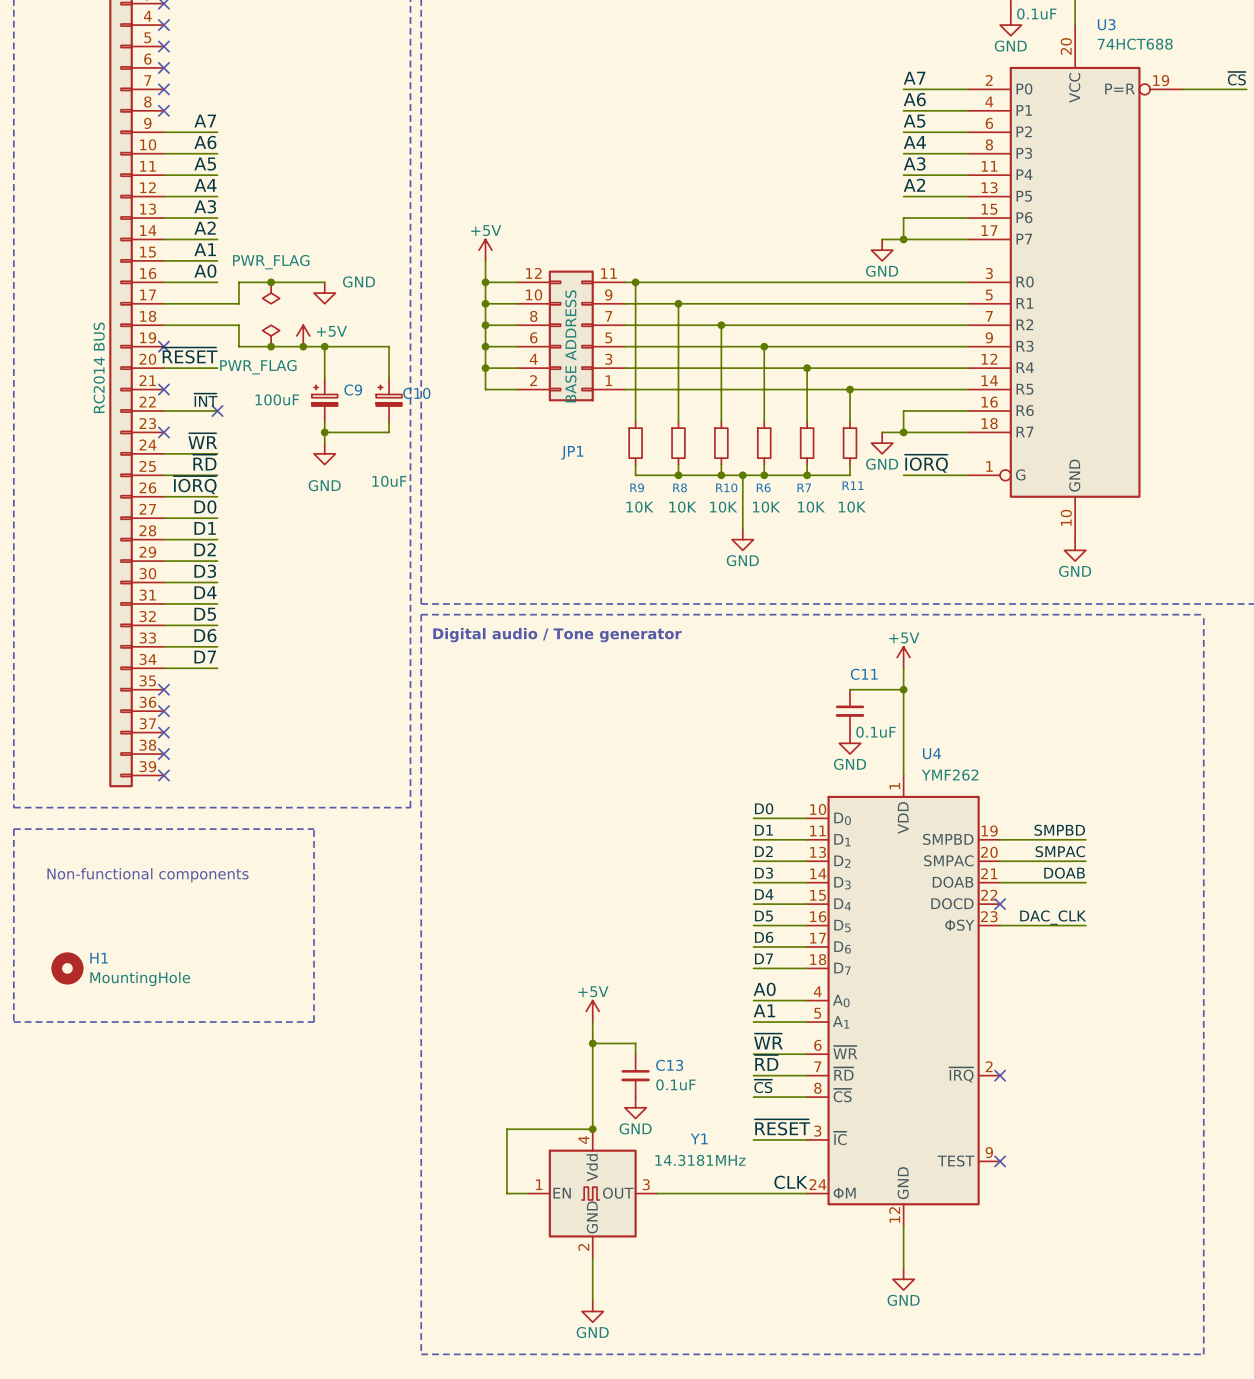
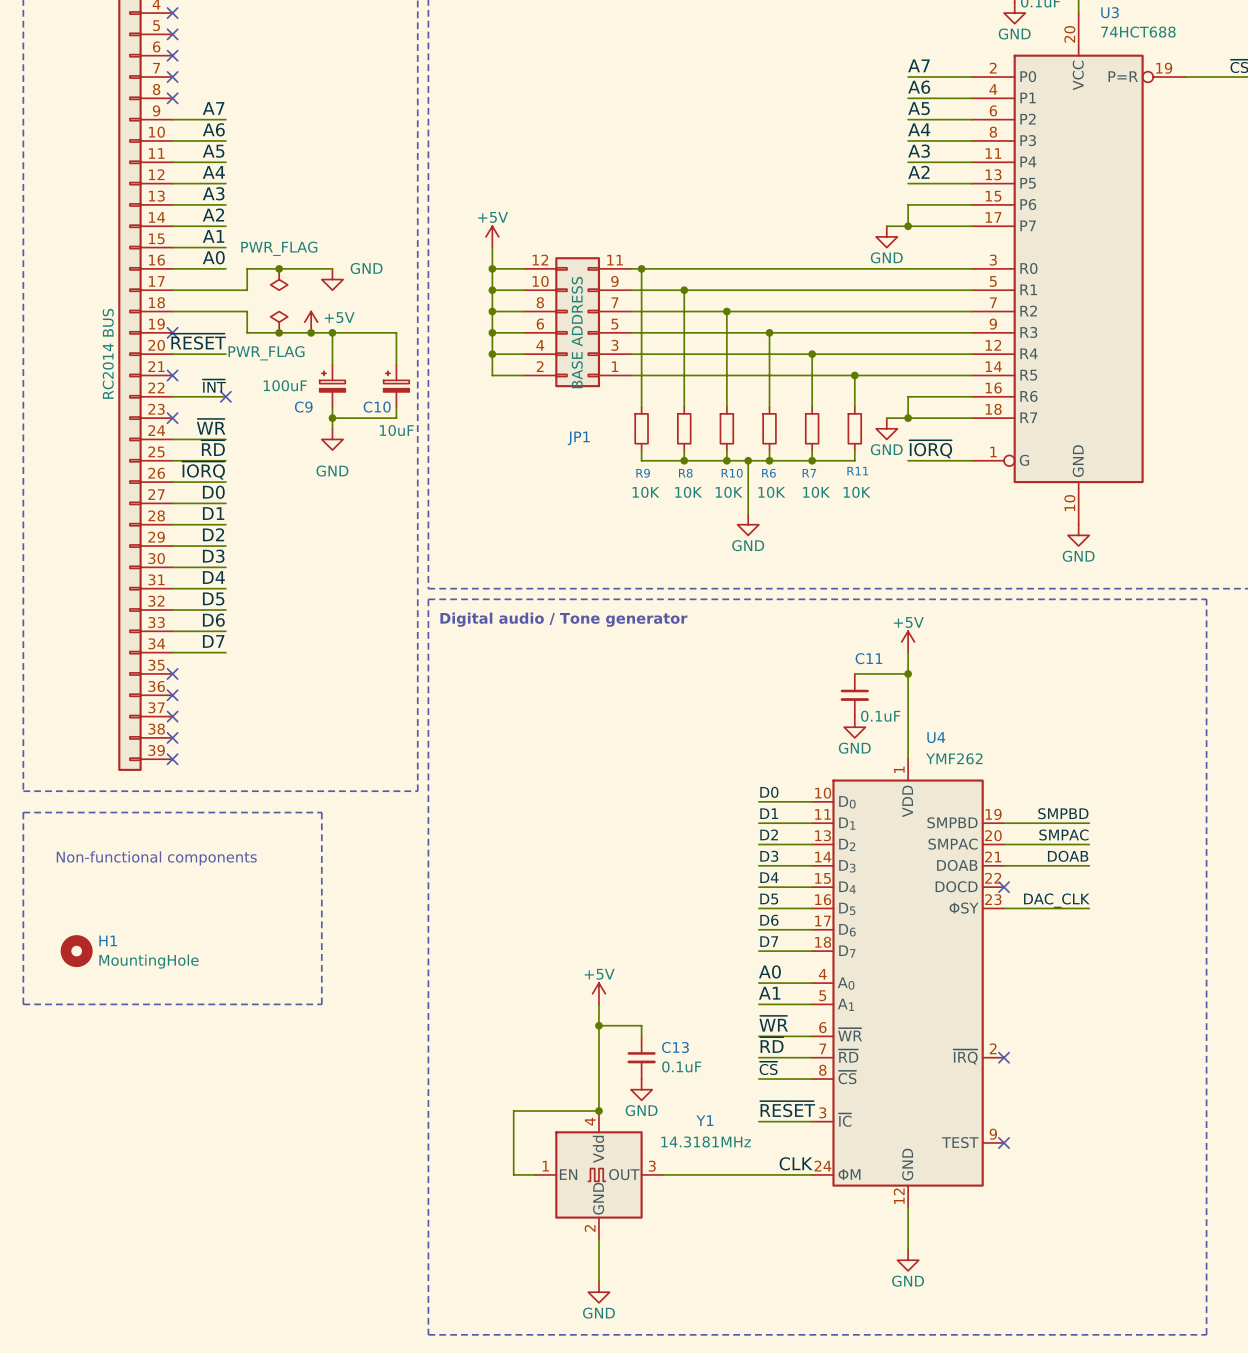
C9 name position: C9 (353, 390) -> C9 (303, 407)
C10 name position: C10 (416, 393) -> C10 (377, 407)
C10 value position: 10uF (389, 481) -> 10uF (396, 430)

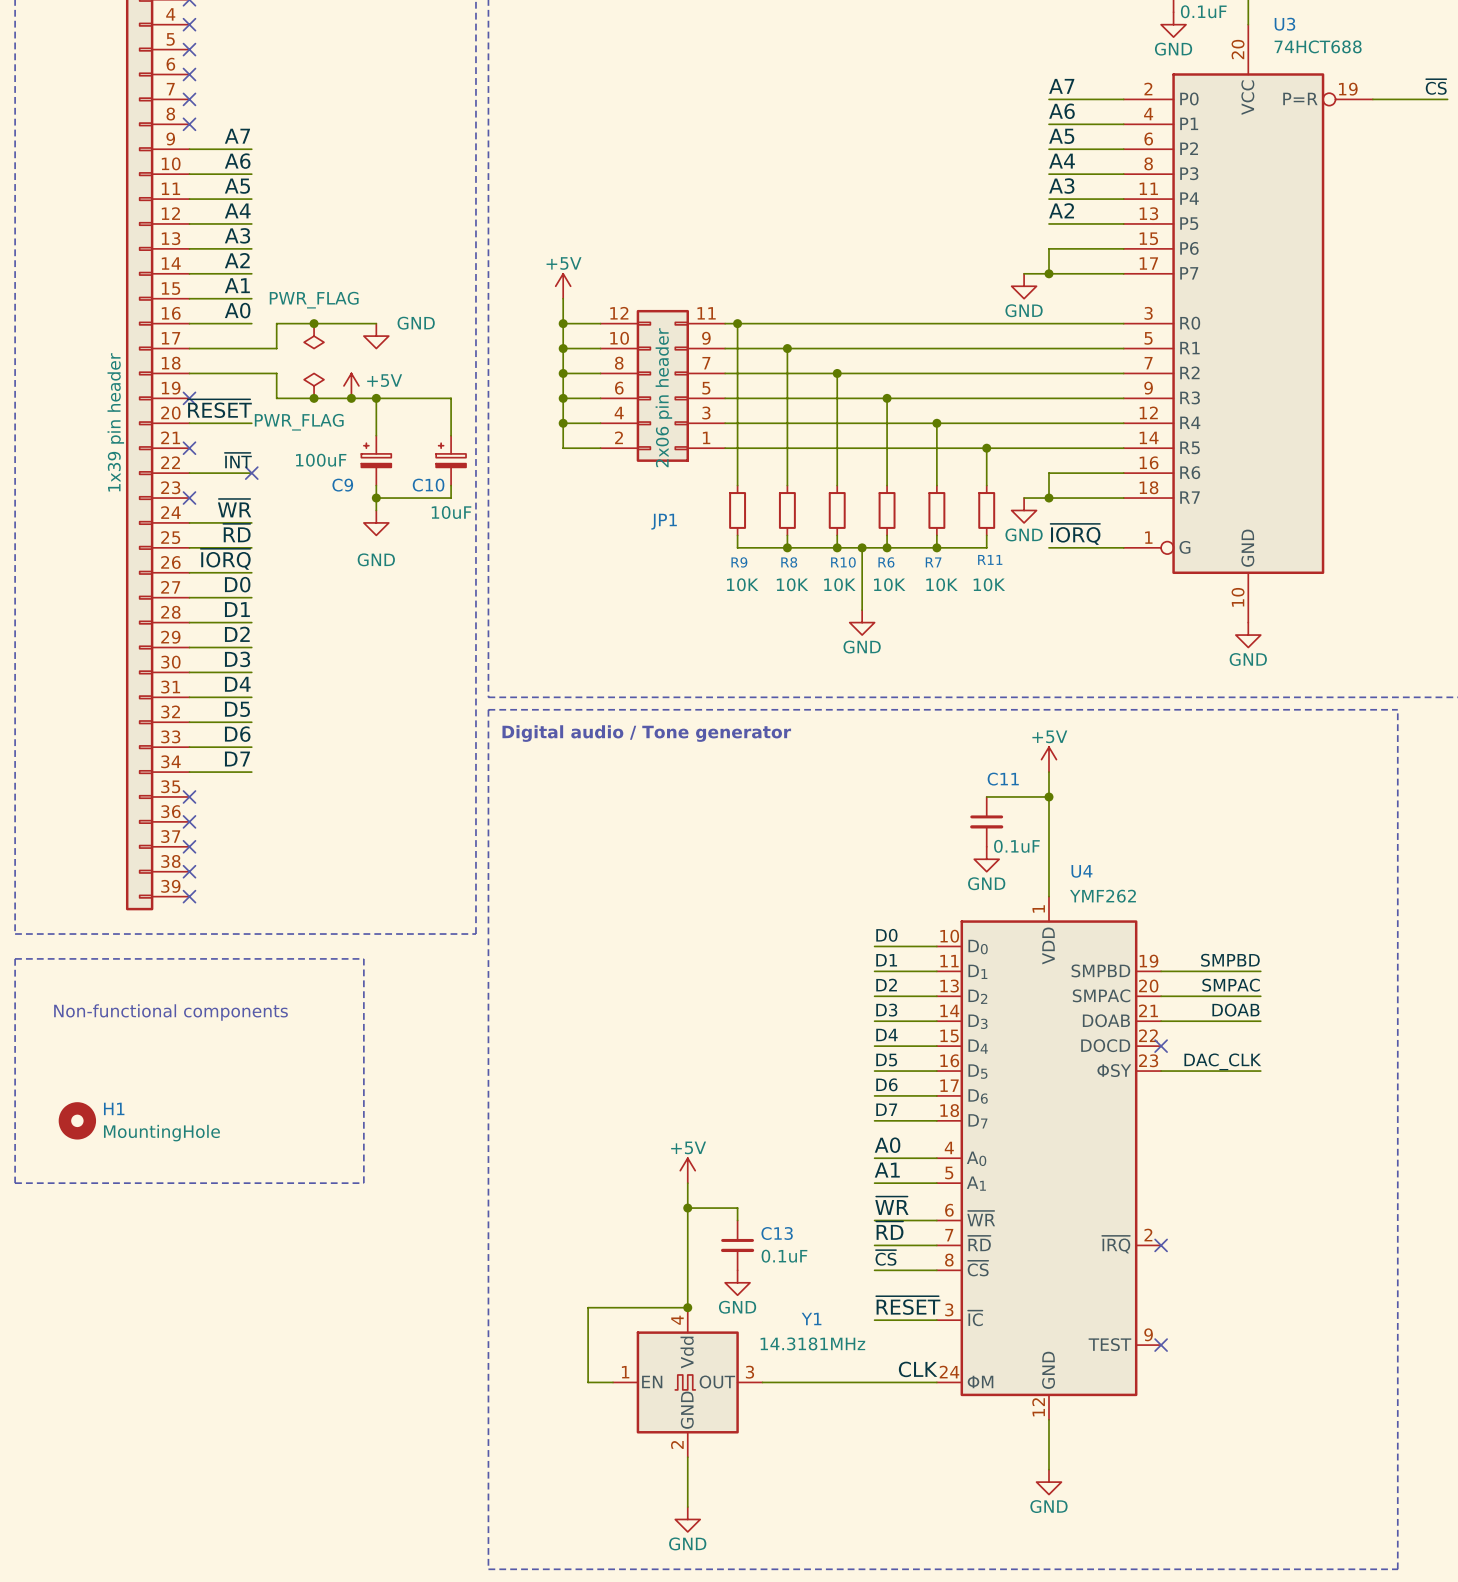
JP1 value: BASE ADDRESS (577, 332) -> 2x06 pin header (663, 397)
part value: RC2014 BUS (108, 353) -> 1x39 pin header (115, 422)

